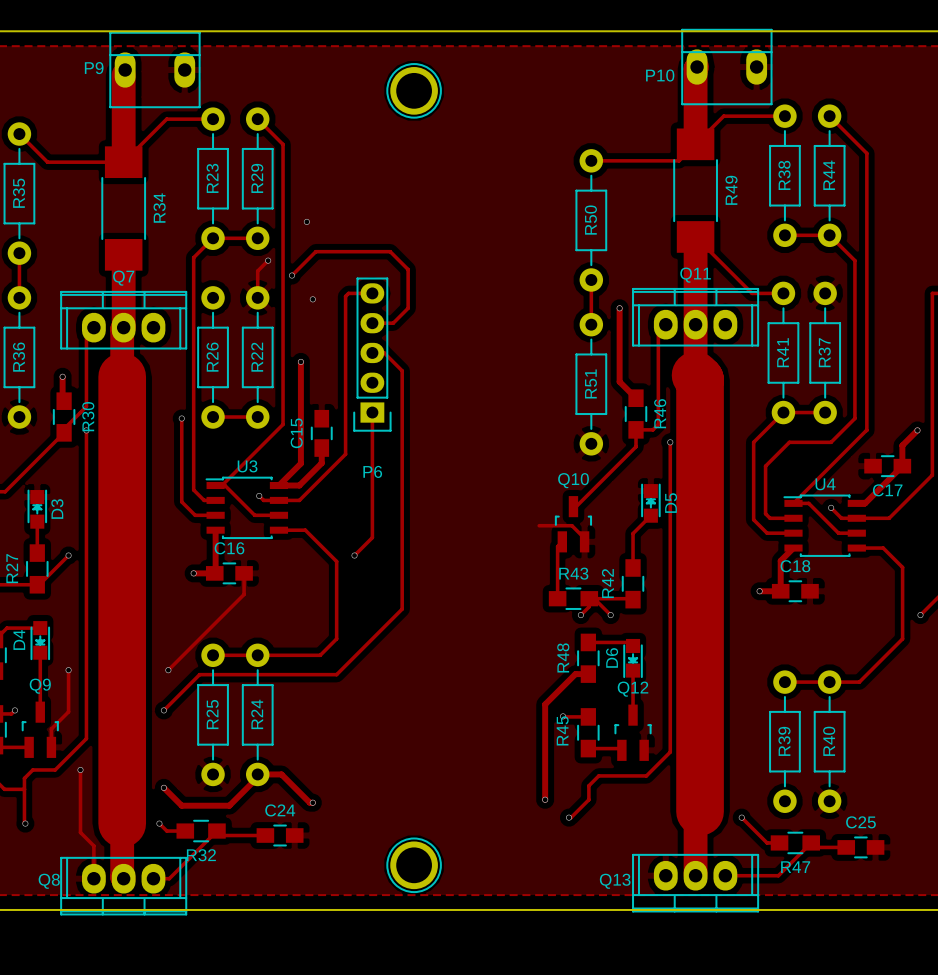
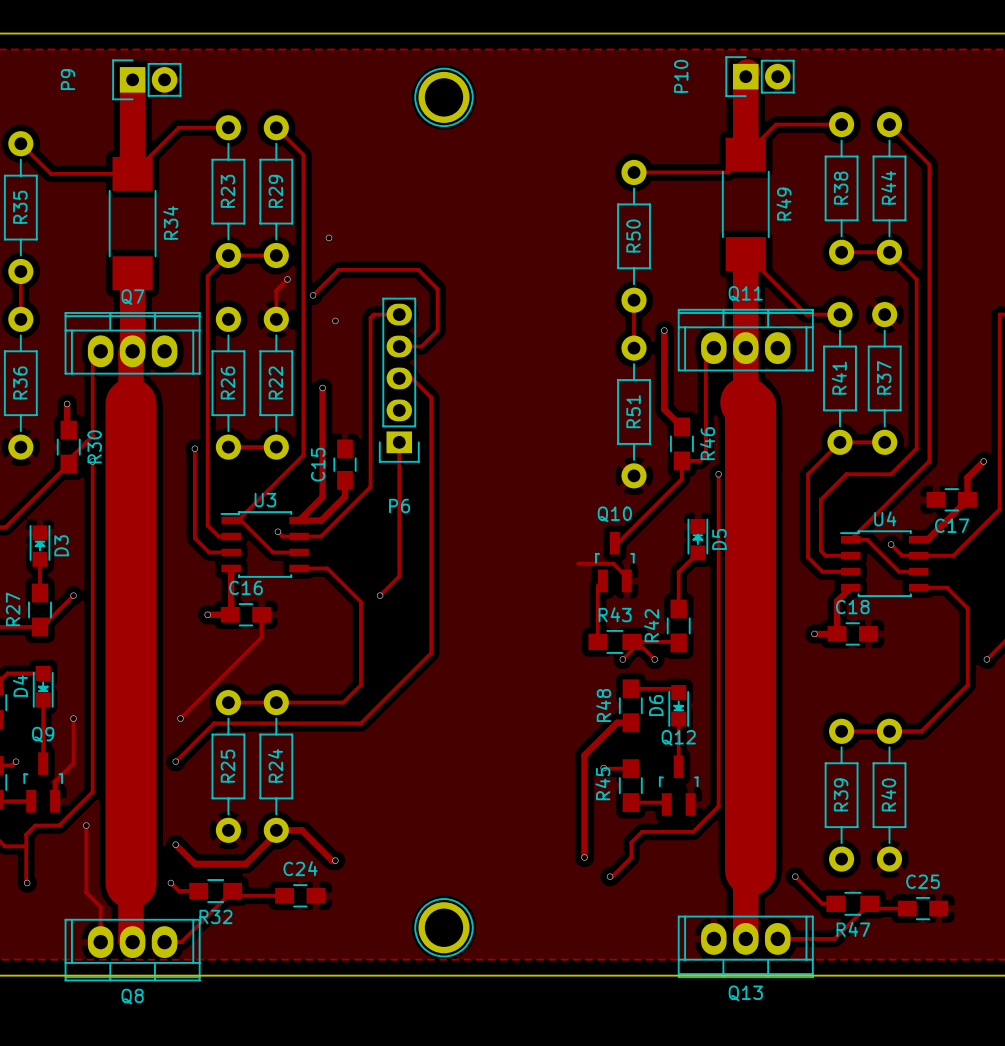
P10 footprint: [681, 28, 773, 106] -> [725, 56, 795, 98]
P9 footprint: [109, 31, 201, 109] -> [112, 59, 182, 101]
Q8 name position: Q8 (49, 881) -> Q8 (132, 996)
Q13 name position: Q13 (615, 881) -> Q13 (745, 993)

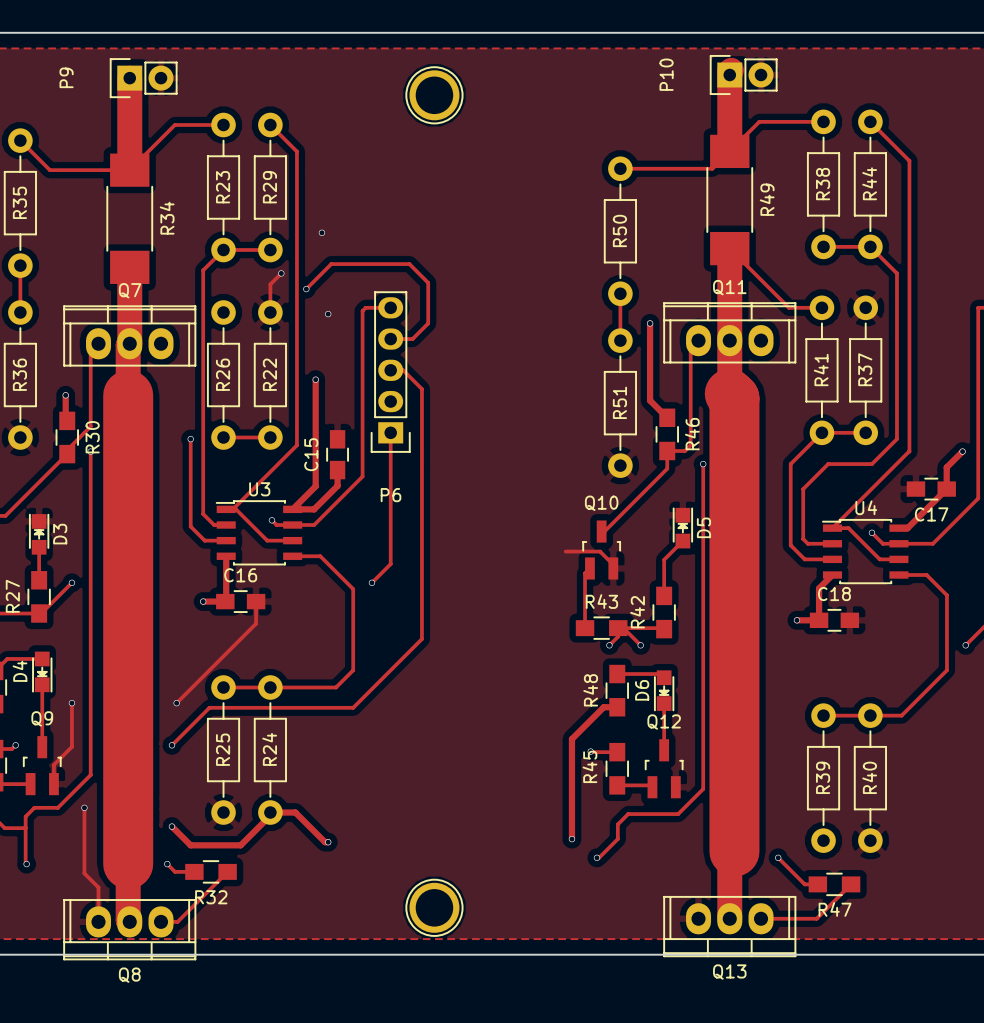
track: (232, 891) (237, 895) (284, 895) -> none
C24: (300, 895) -> none
track: (869, 903) (874, 908) (907, 908) -> none
C25: (923, 908) -> none

